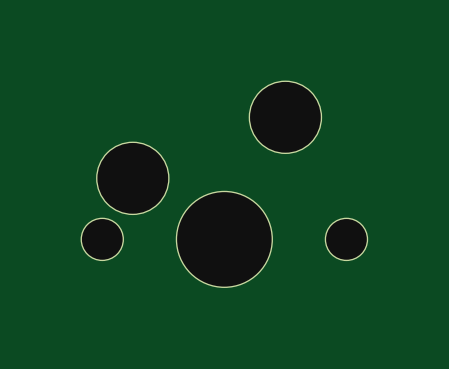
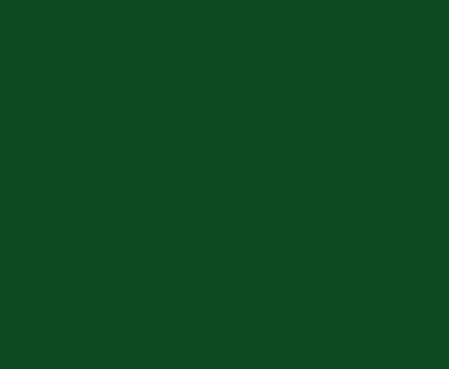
part: (224, 184) -> none

